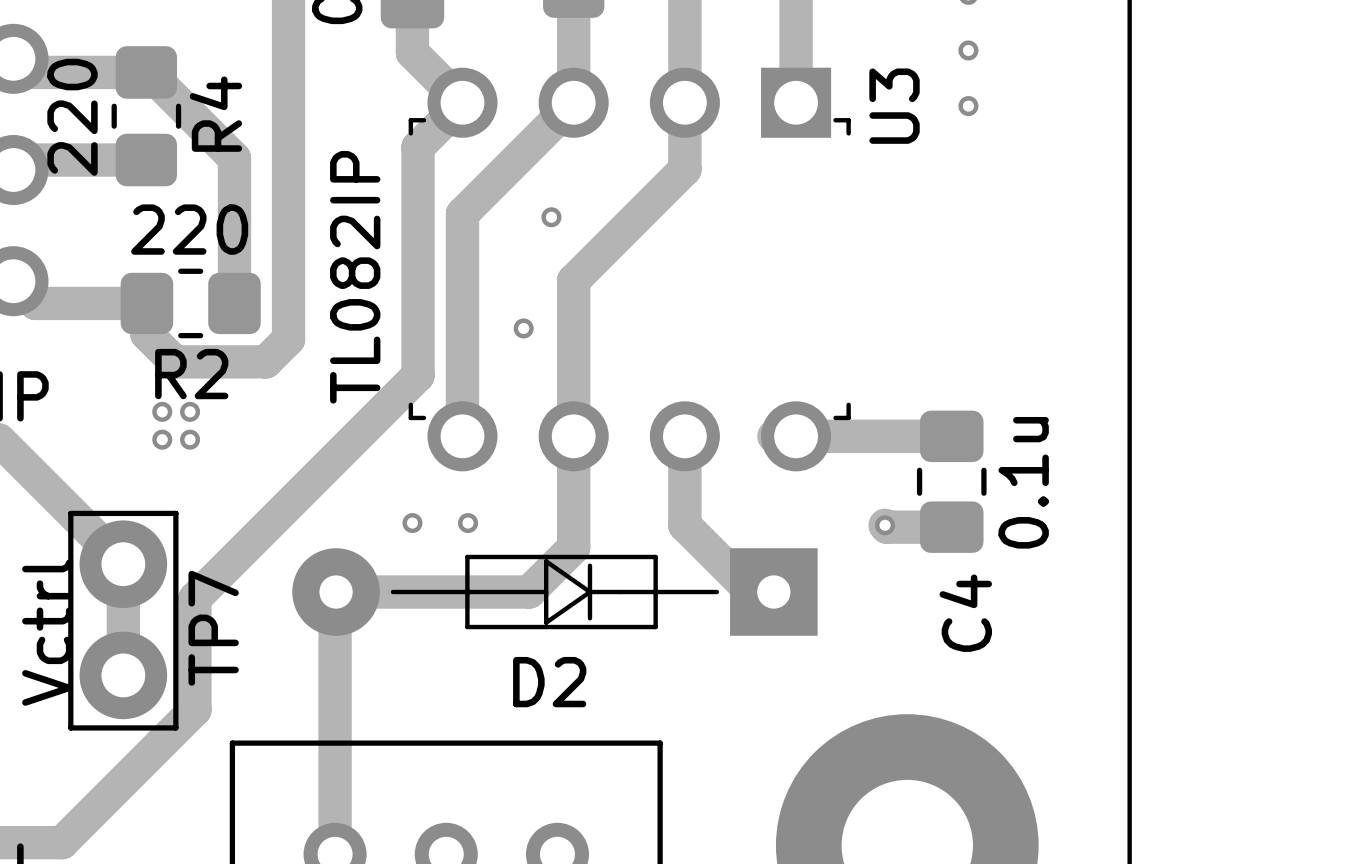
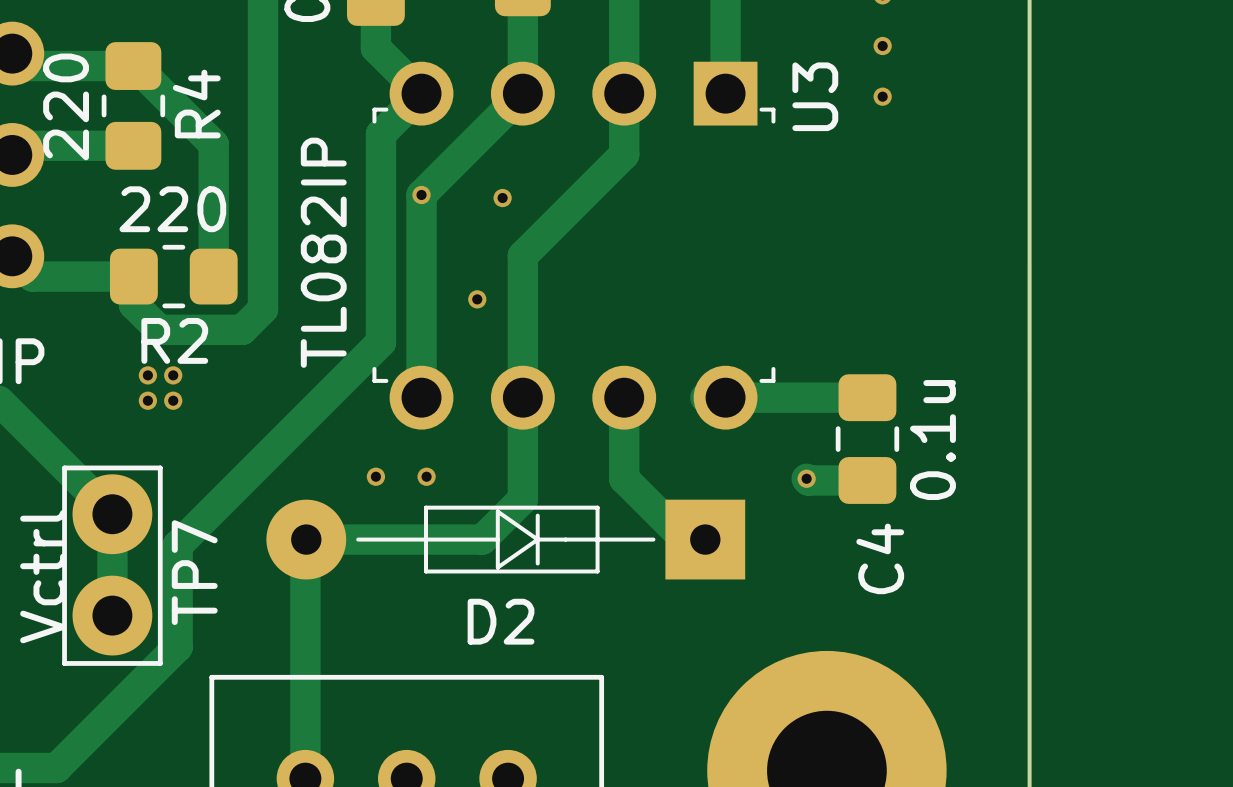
via: none -> (421, 194)

